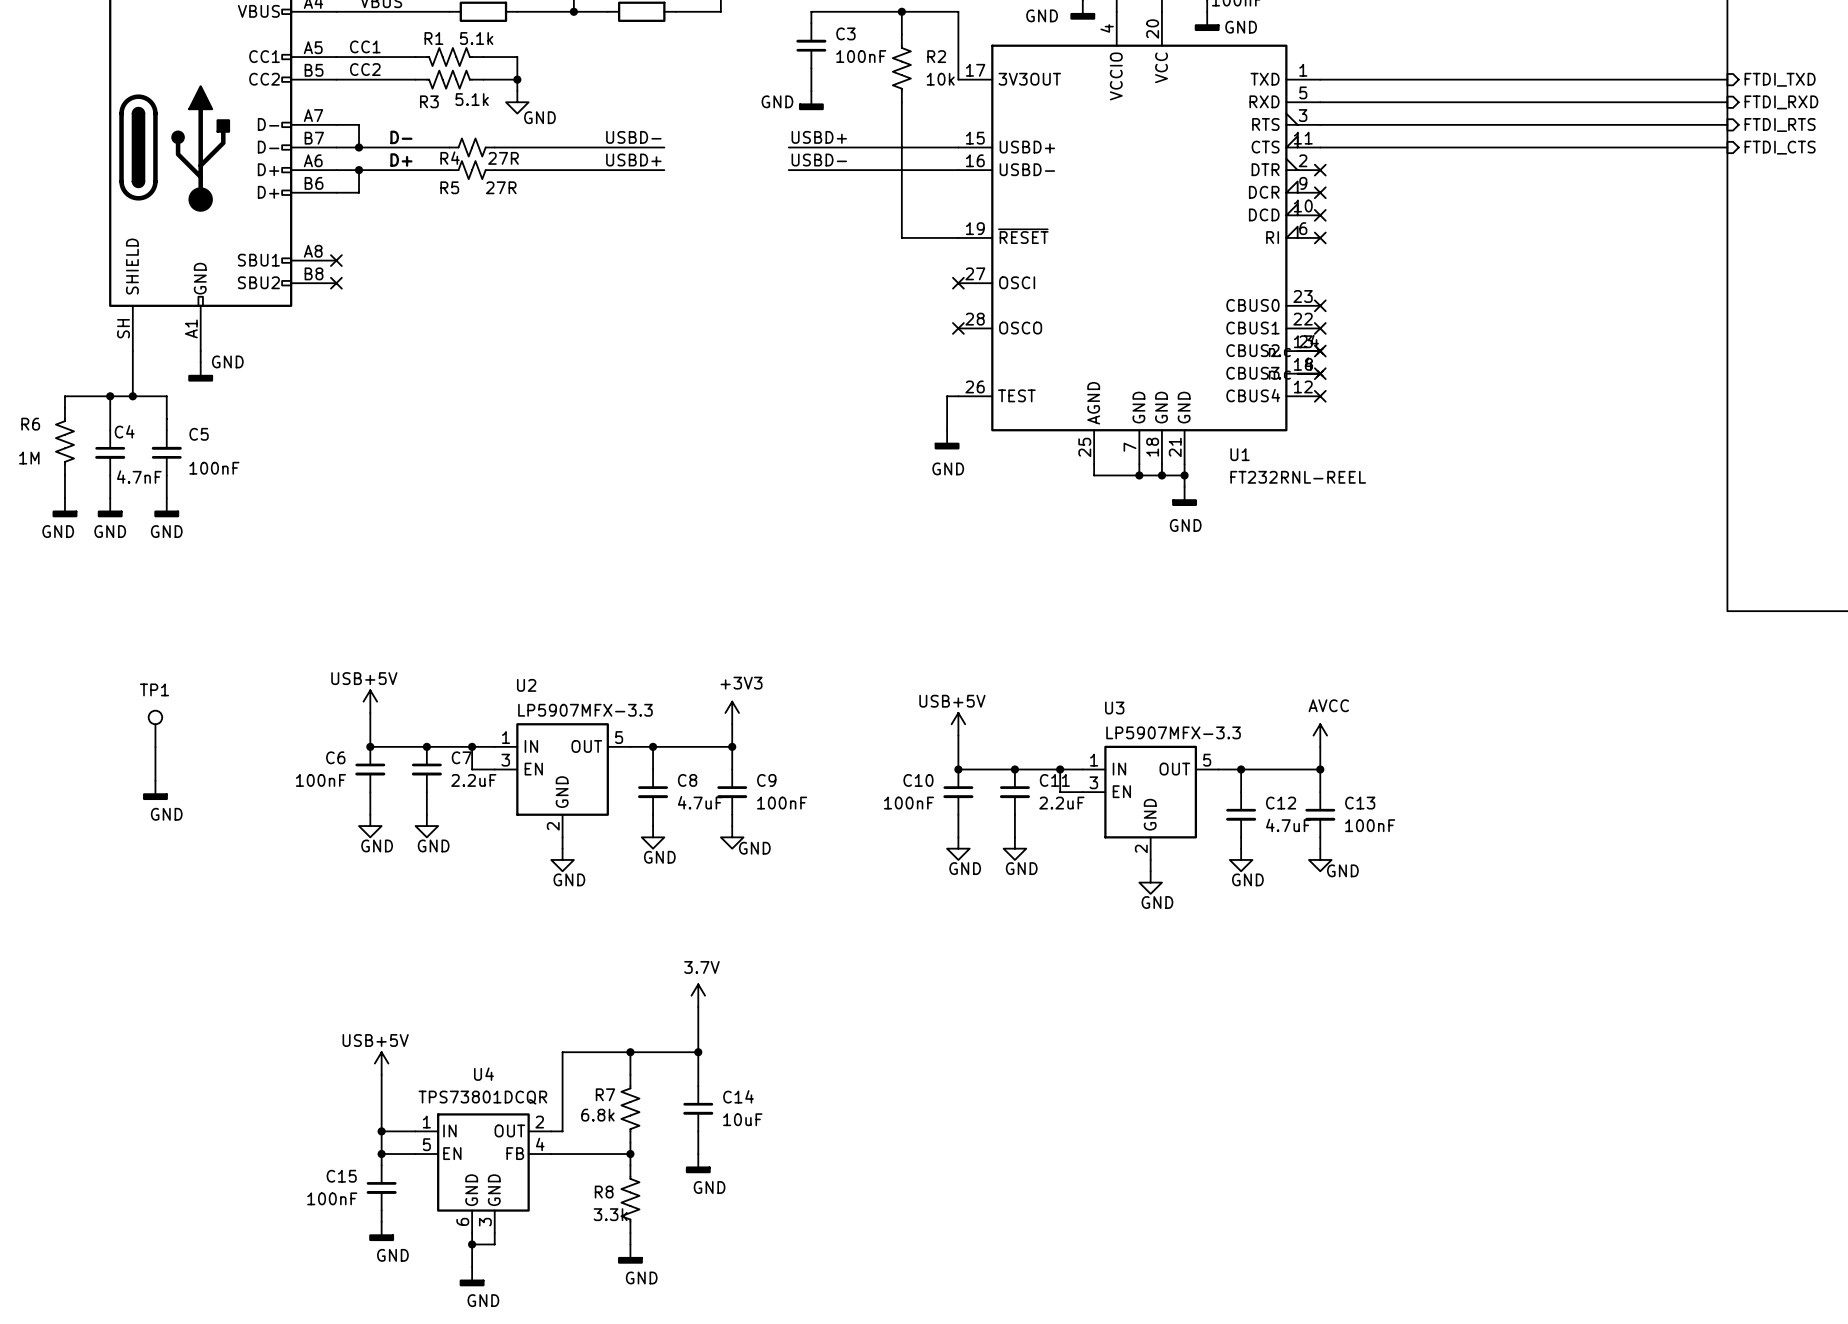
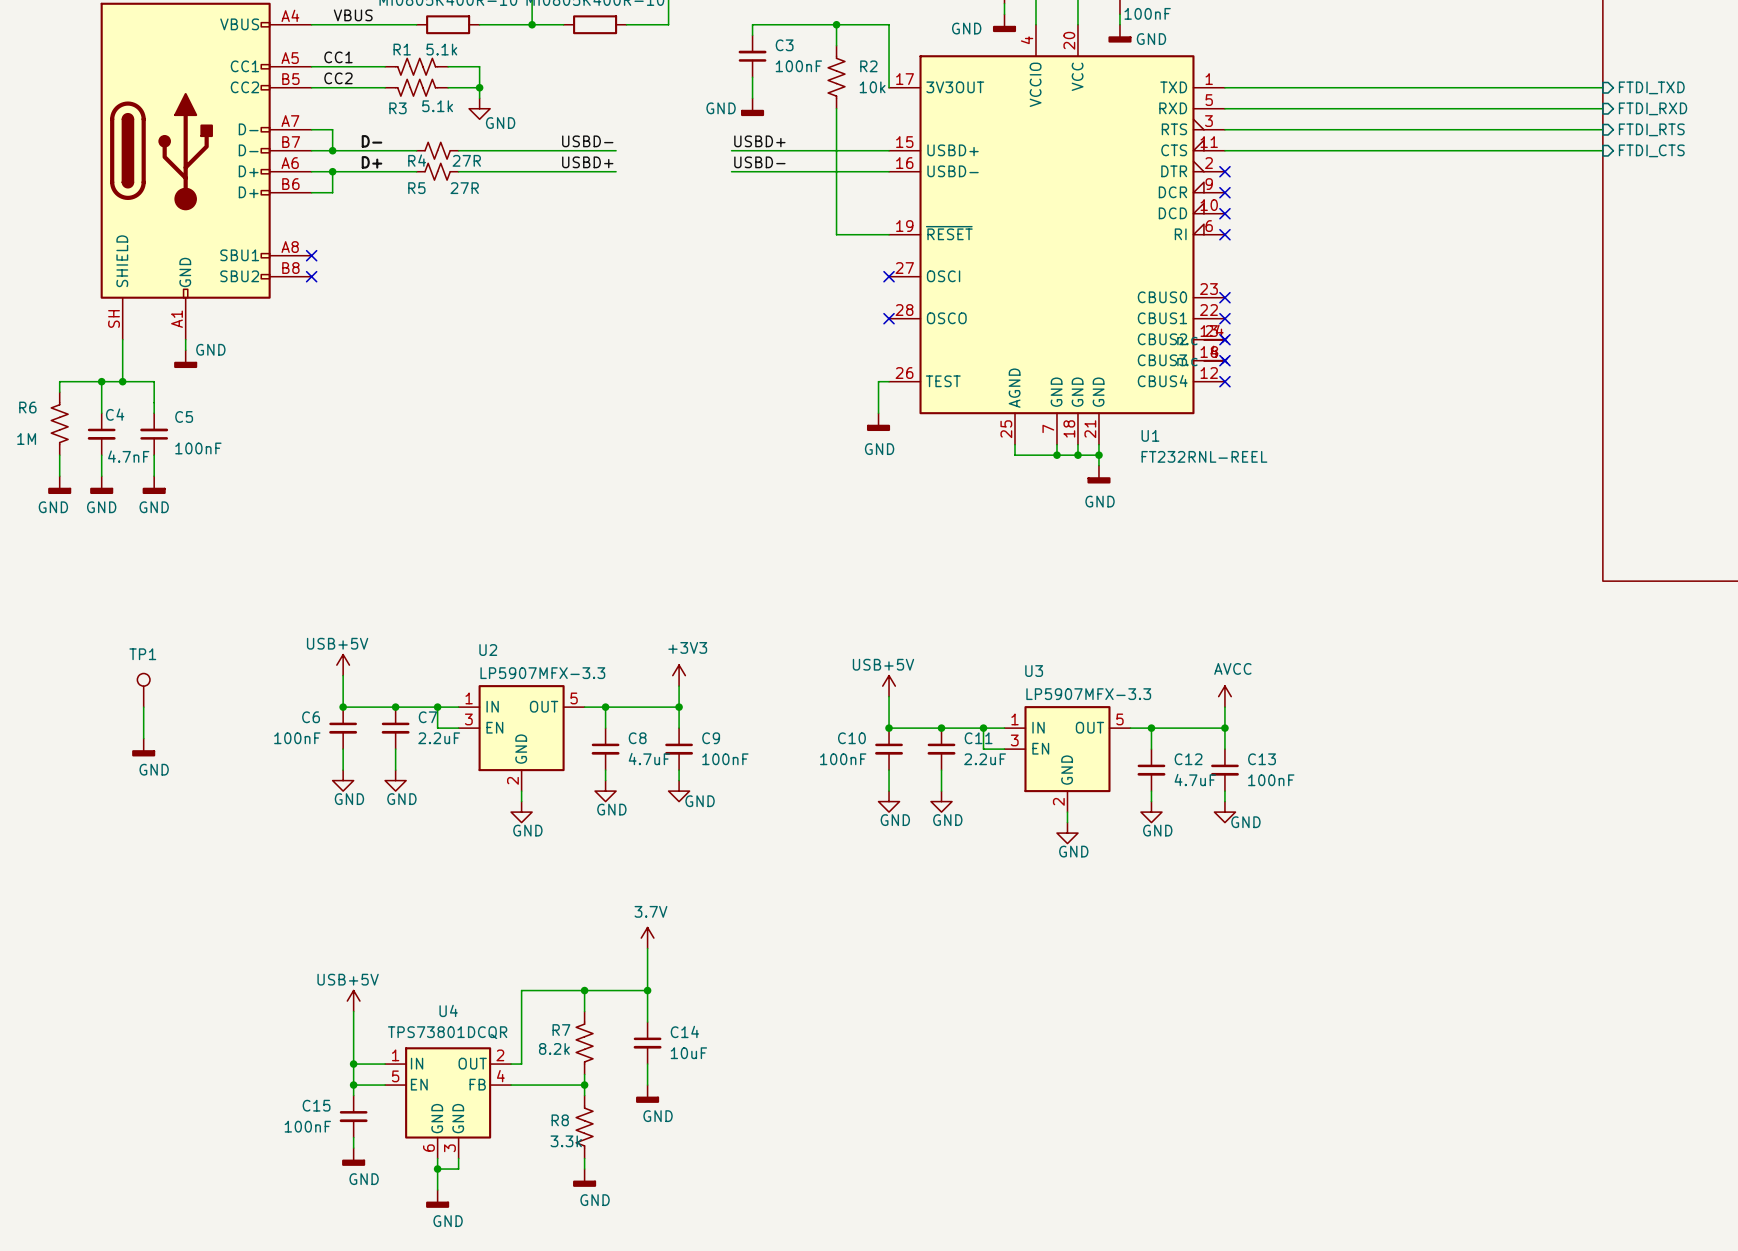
R7 value: 6.8k (597, 1115) -> 8.2k (554, 1048)

